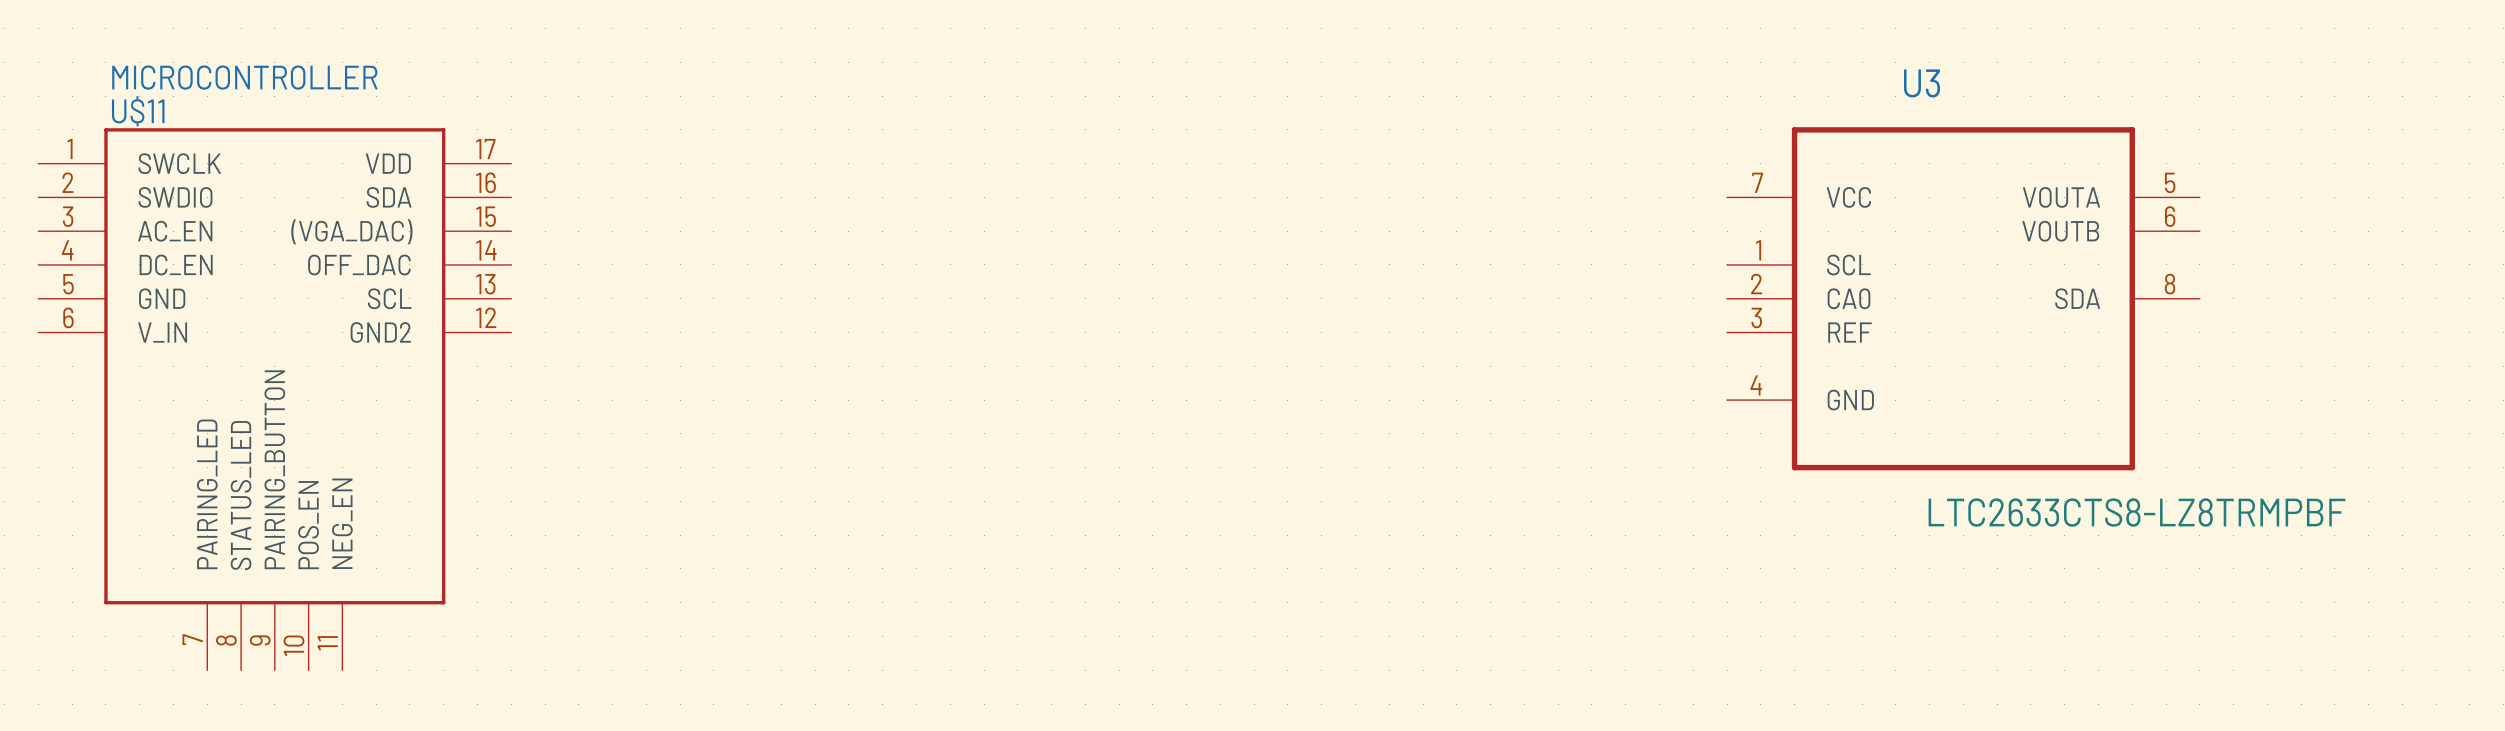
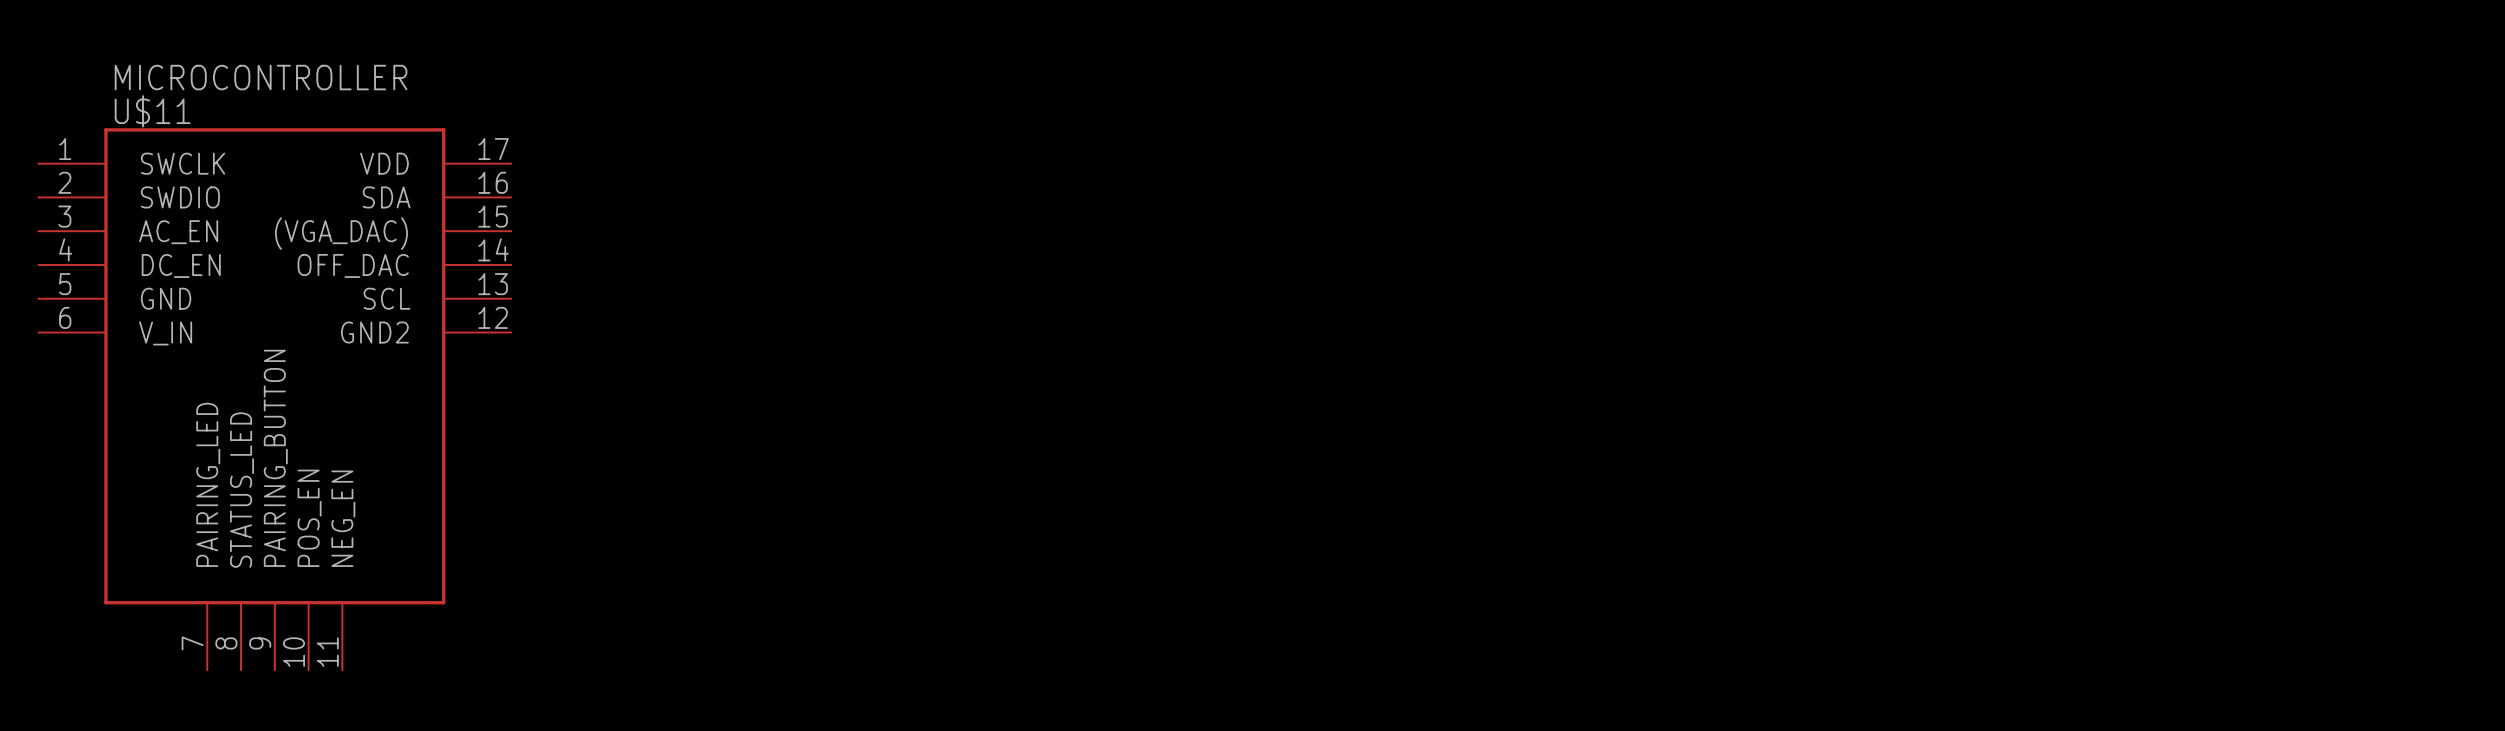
U3: LTC2633CTS8-LZ8TRMPBF (1963, 298) -> none

